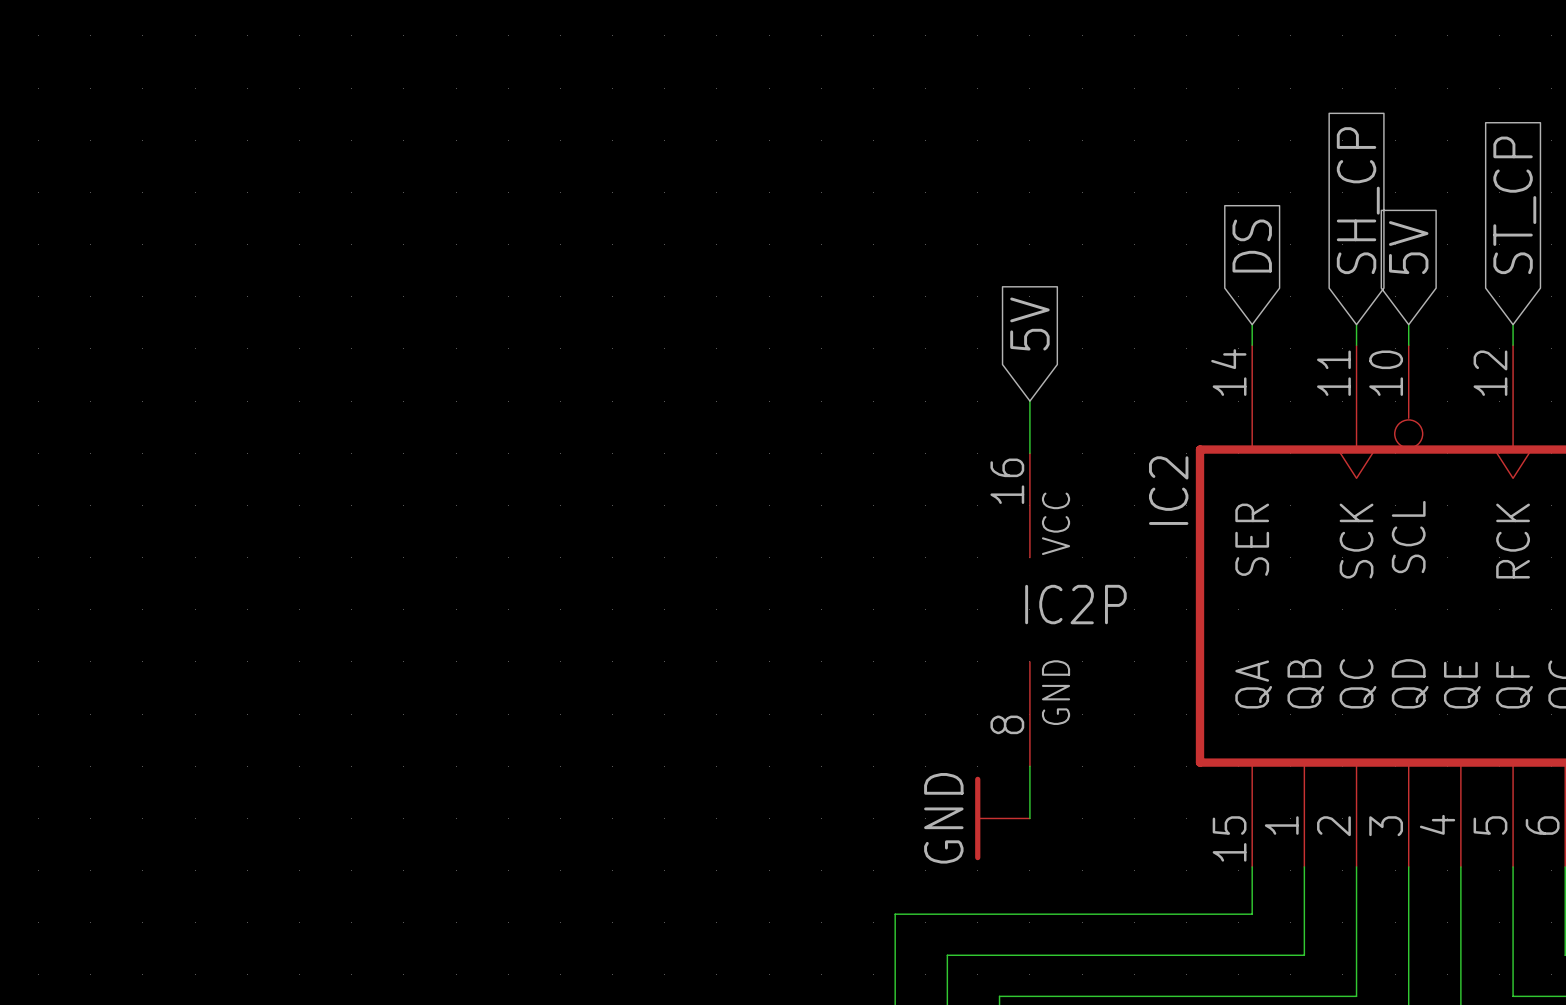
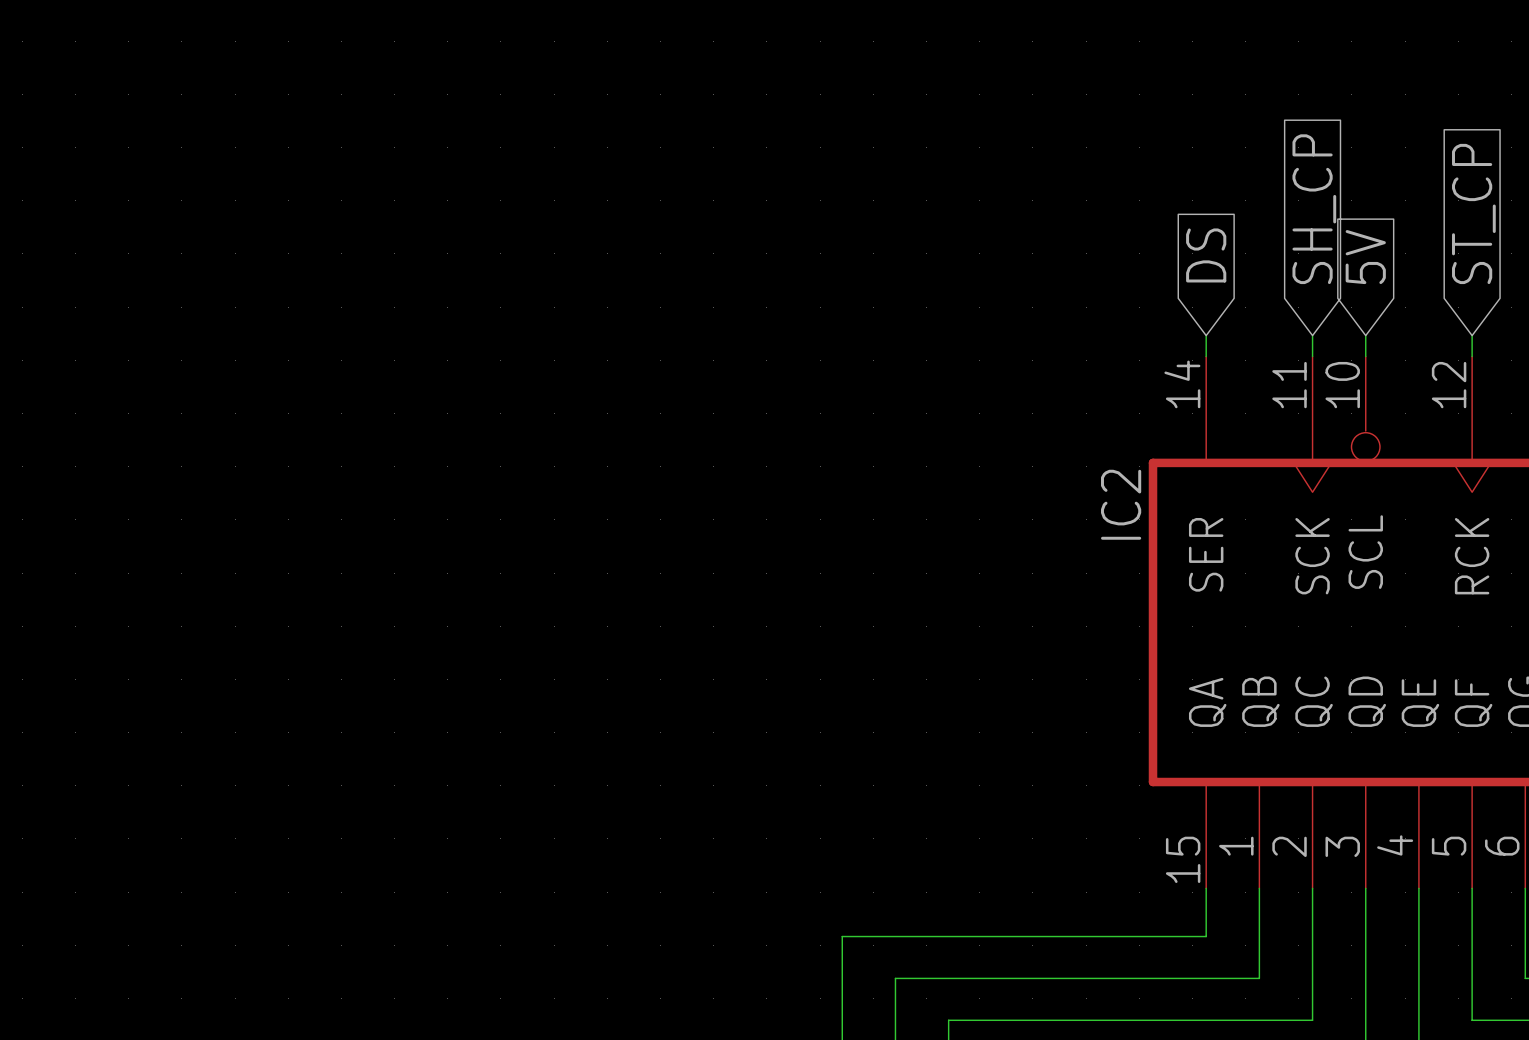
global label: 5V (1029, 324) -> none
wire: (1029, 401) (1029, 453) -> none
IC2P: (1029, 609) -> none
wire: (1029, 766) (1029, 818) -> none
power symbol: GND (1002, 818) -> none

